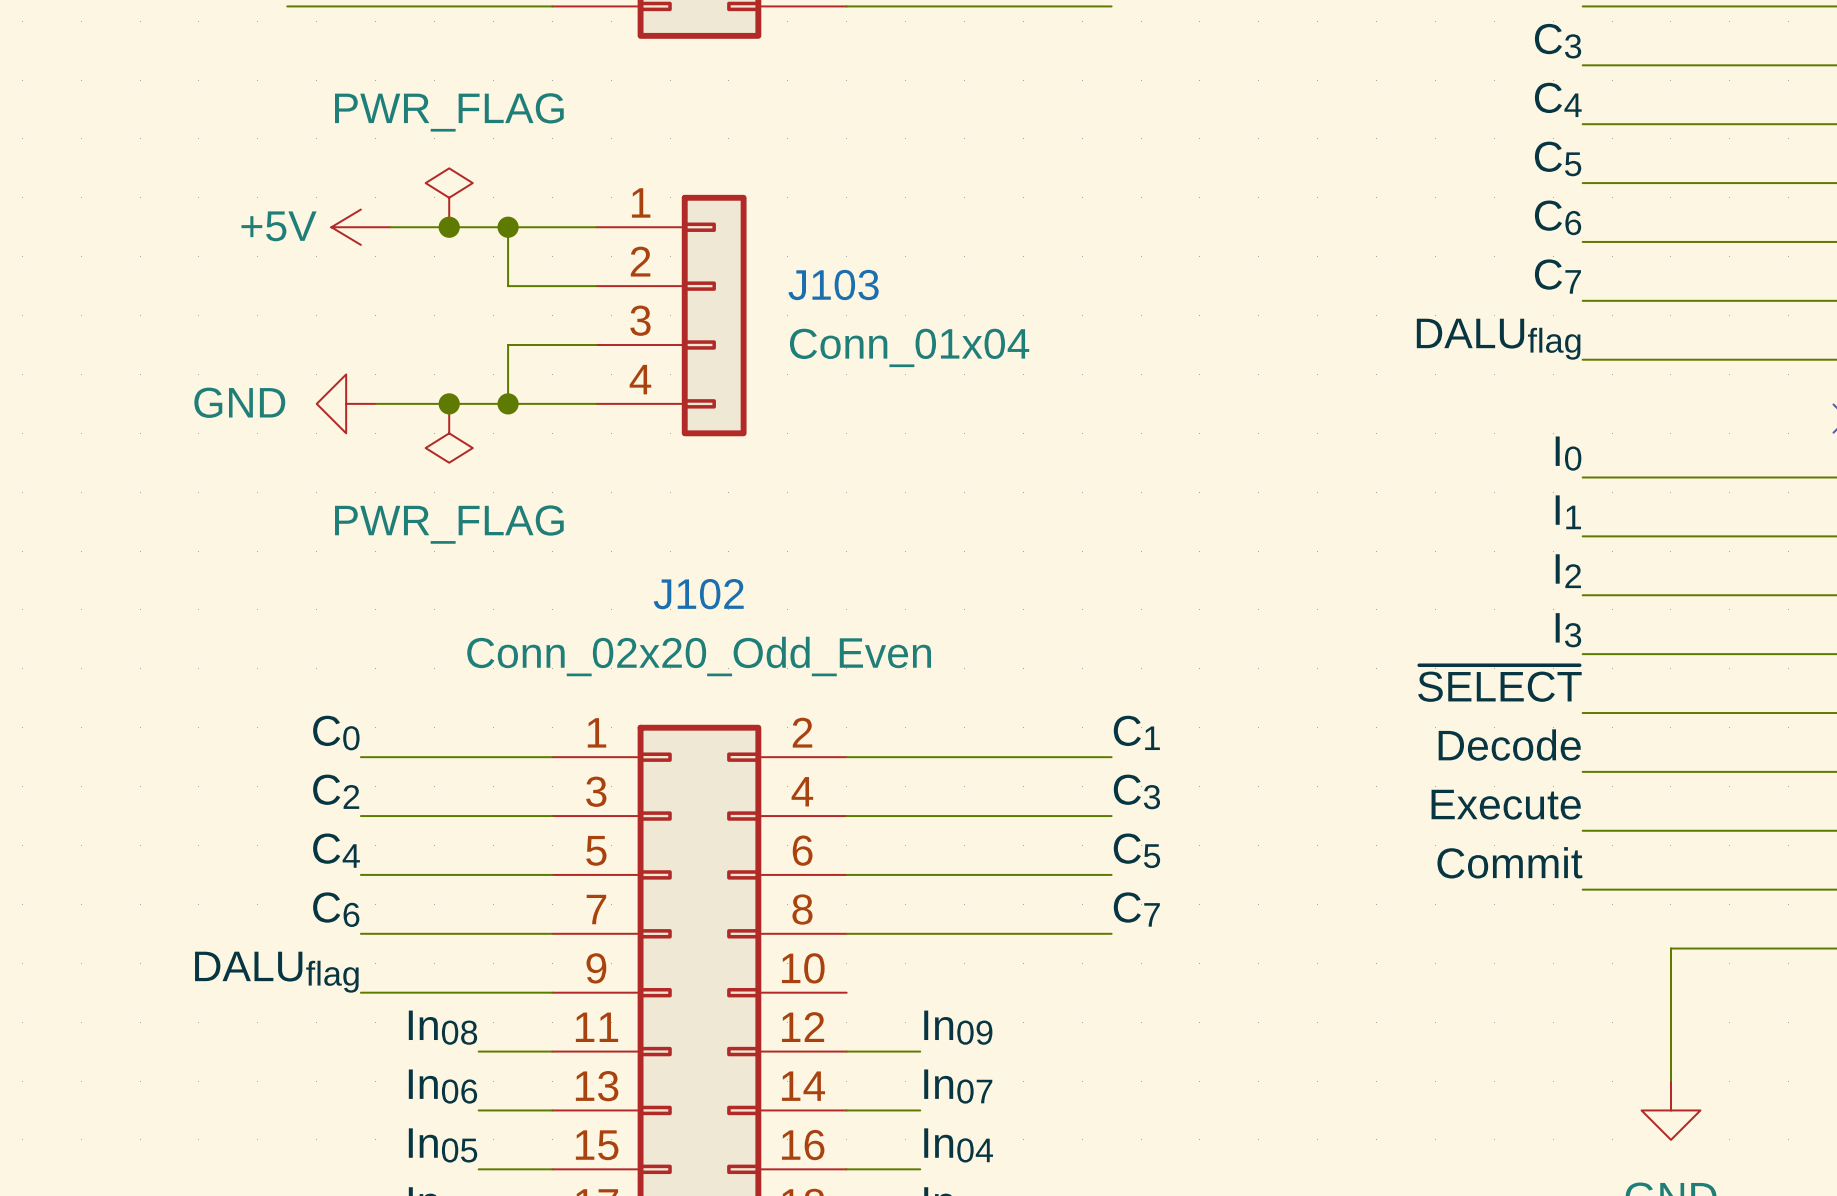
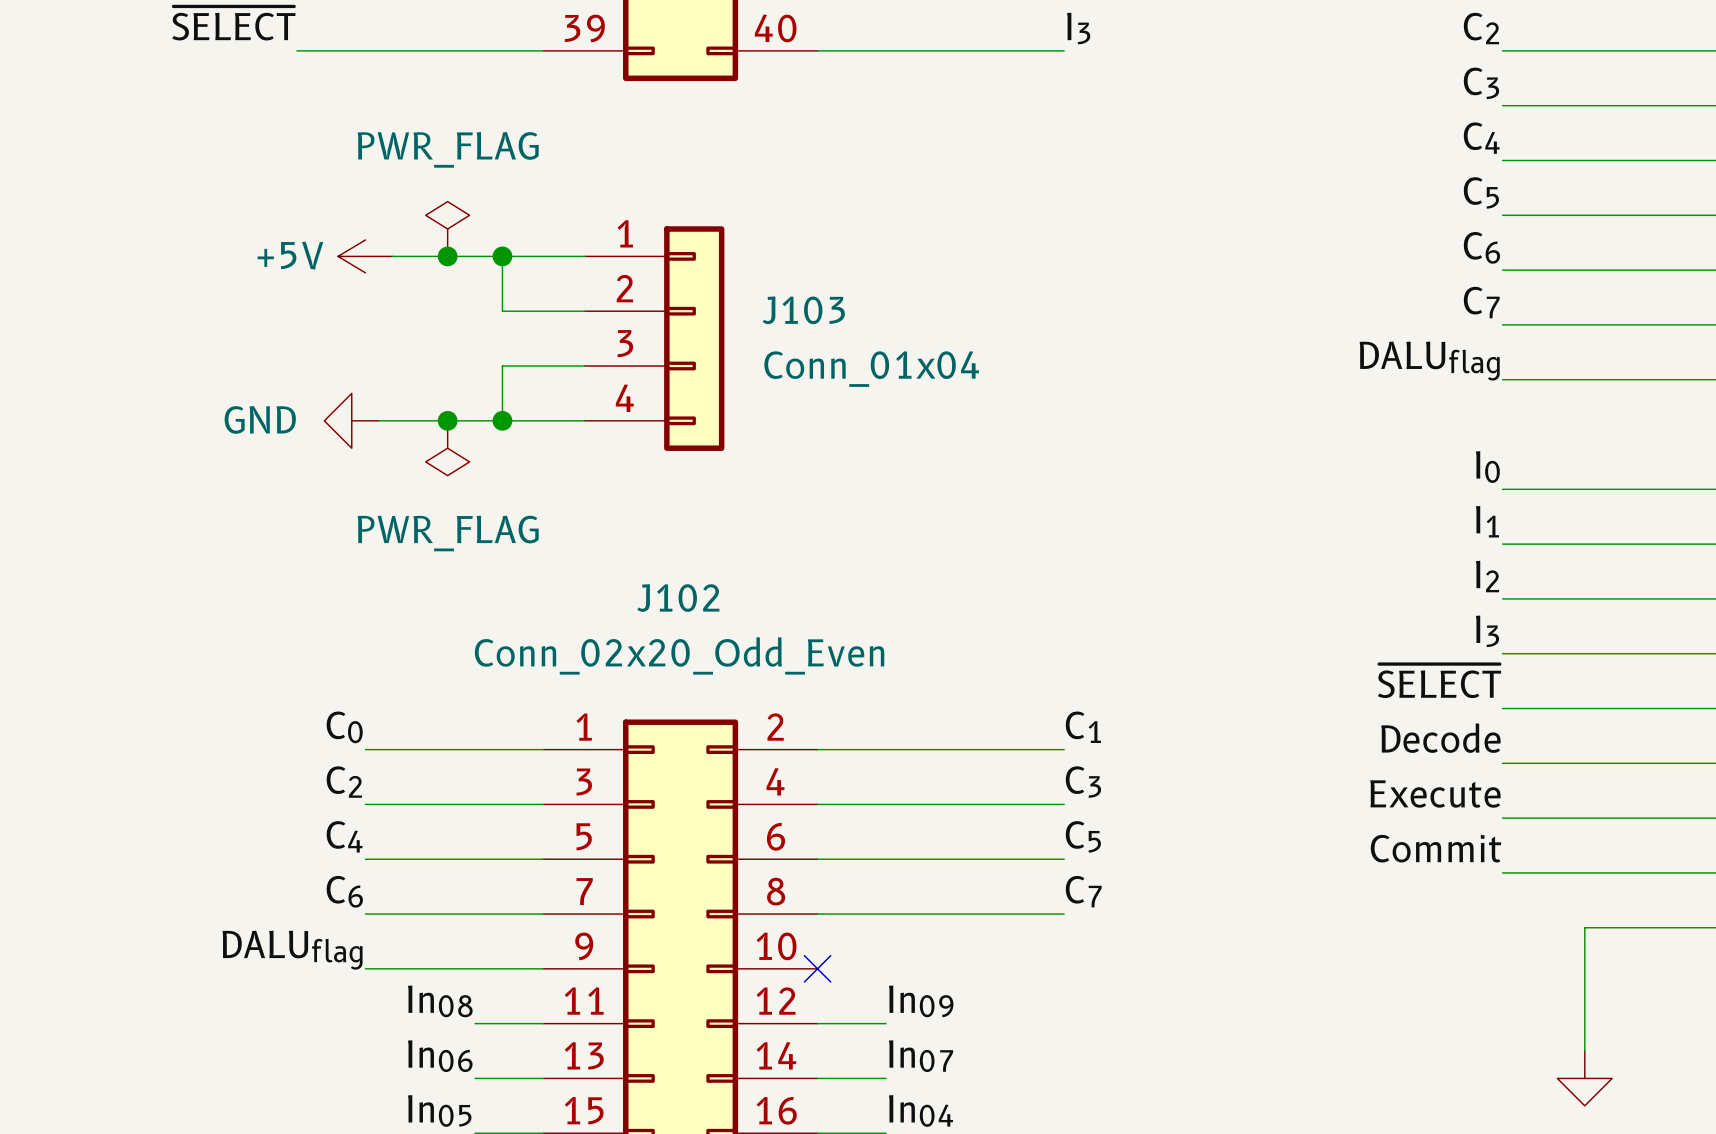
no-connect mark: none -> (817, 968)

